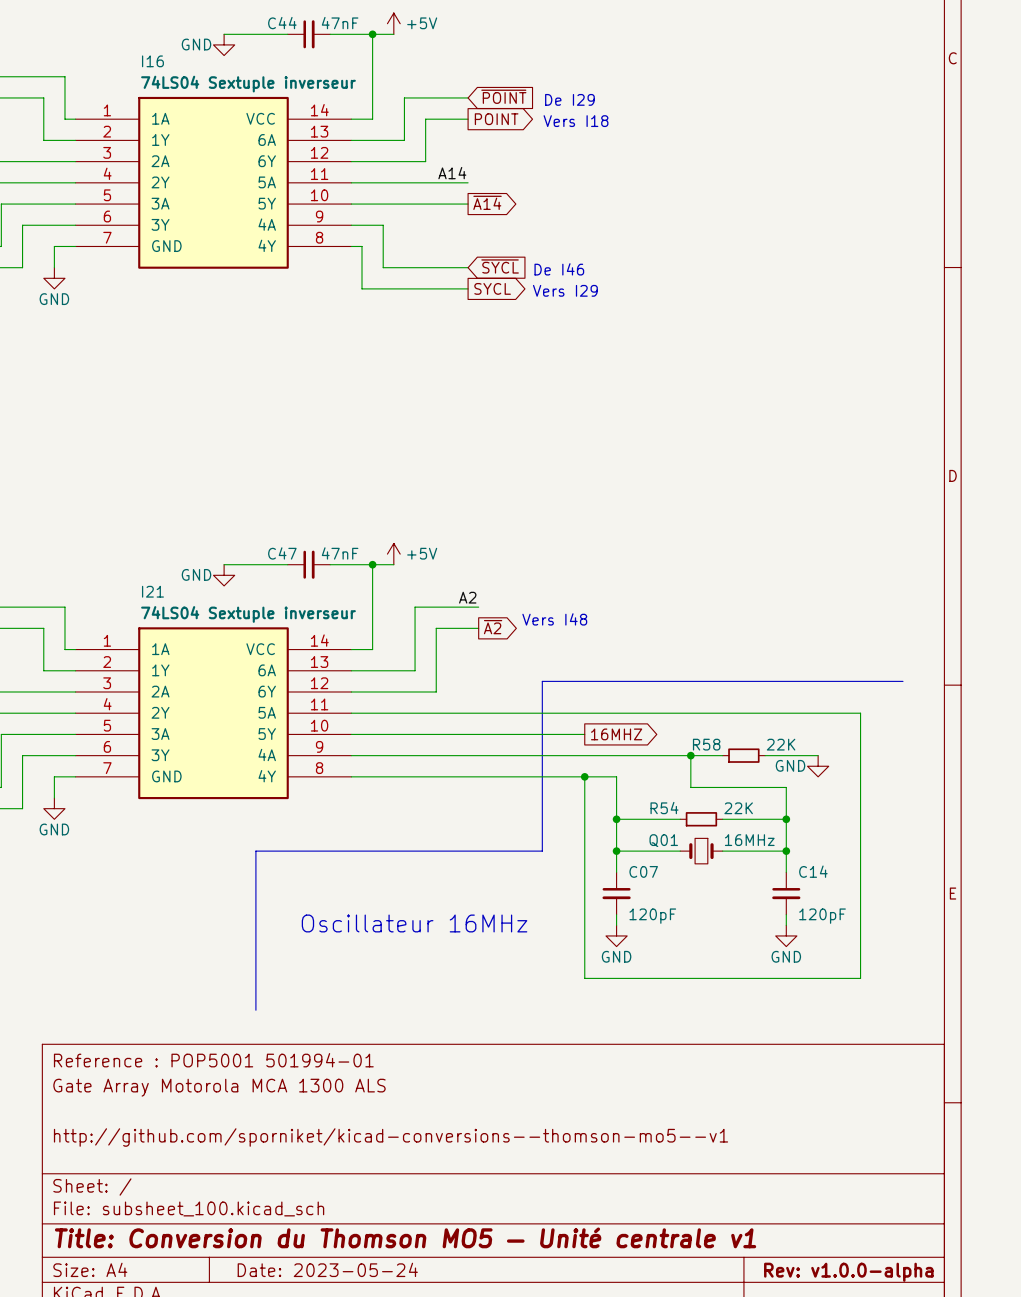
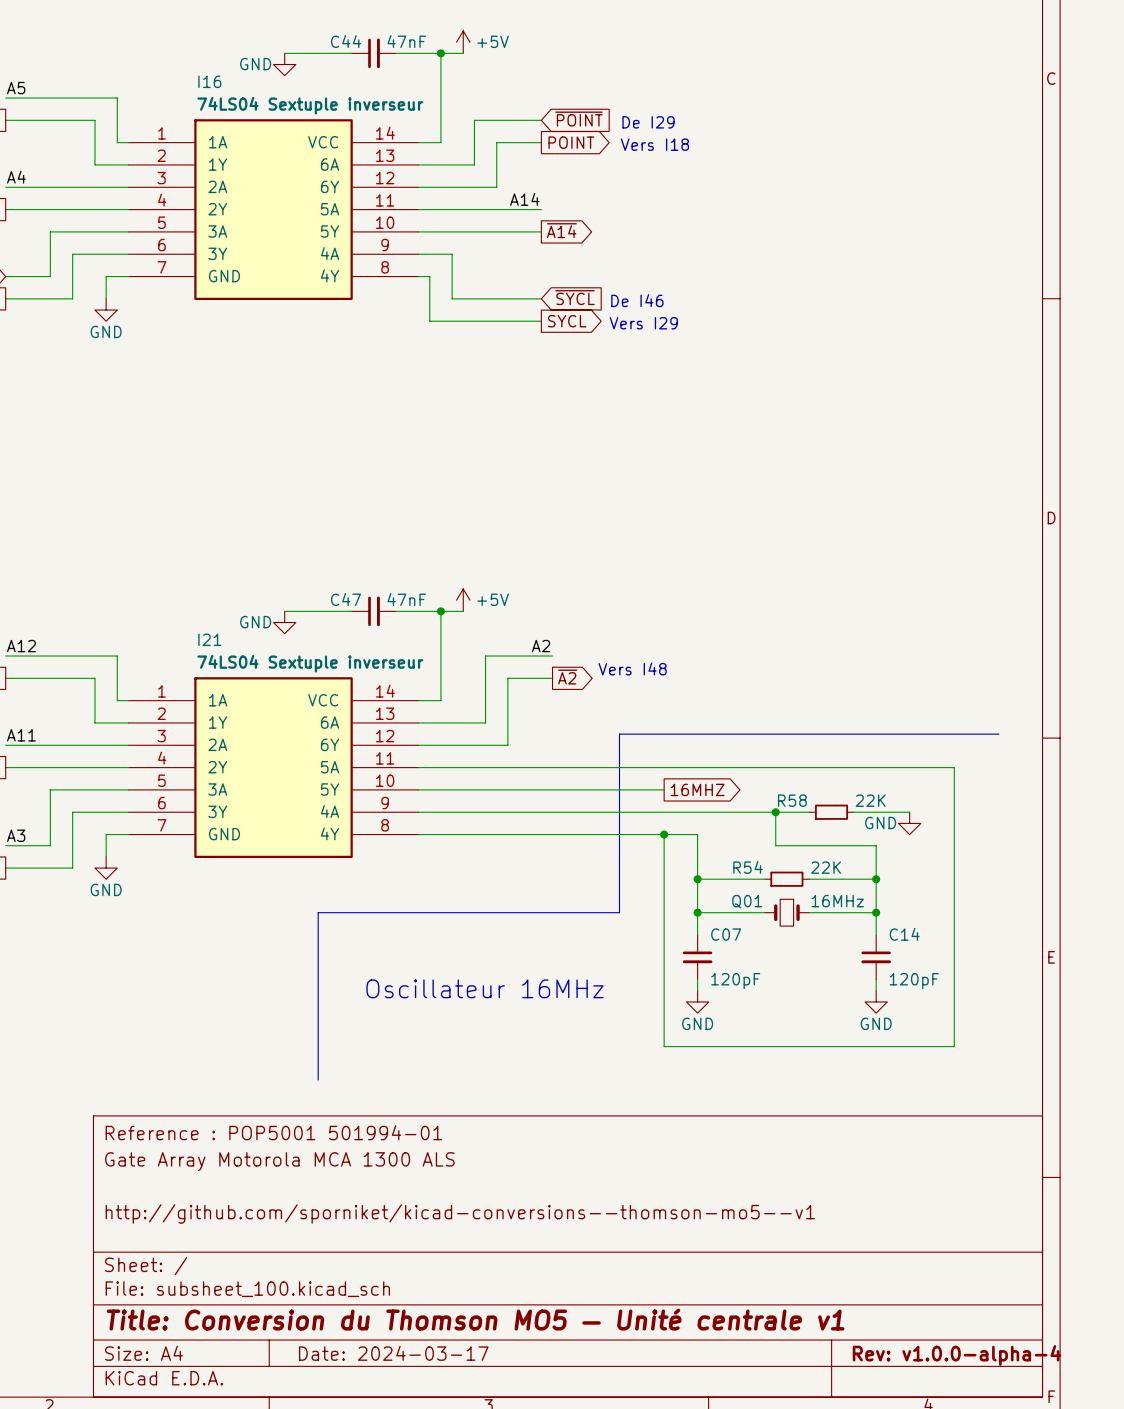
title block: Date: 2023-05-24 (327, 1269) -> Date: 2024-03-17 (393, 1353)
title block: Rev: v1.0.0-alpha (848, 1272) -> Rev: v1.0.0-alpha-4 (957, 1355)

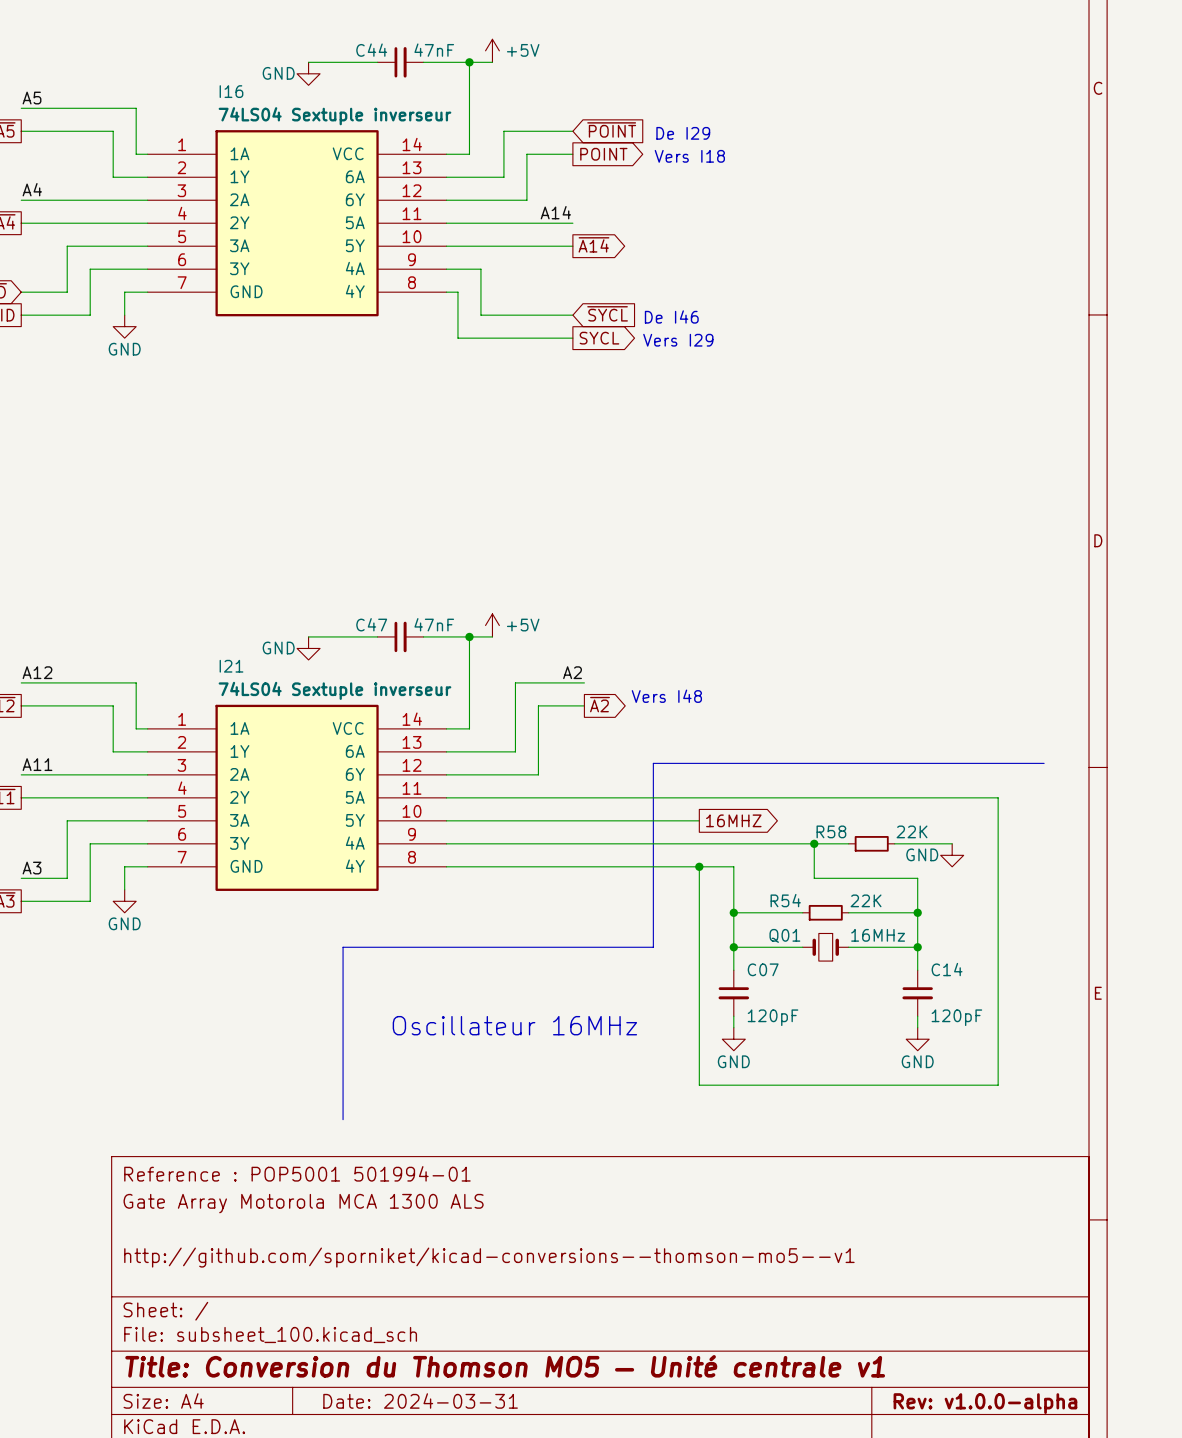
title block: Date: 2024-03-17 (393, 1353) -> Date: 2024-03-31 (420, 1400)
title block: Rev: v1.0.0-alpha-4 (957, 1355) -> Rev: v1.0.0-alpha (985, 1403)

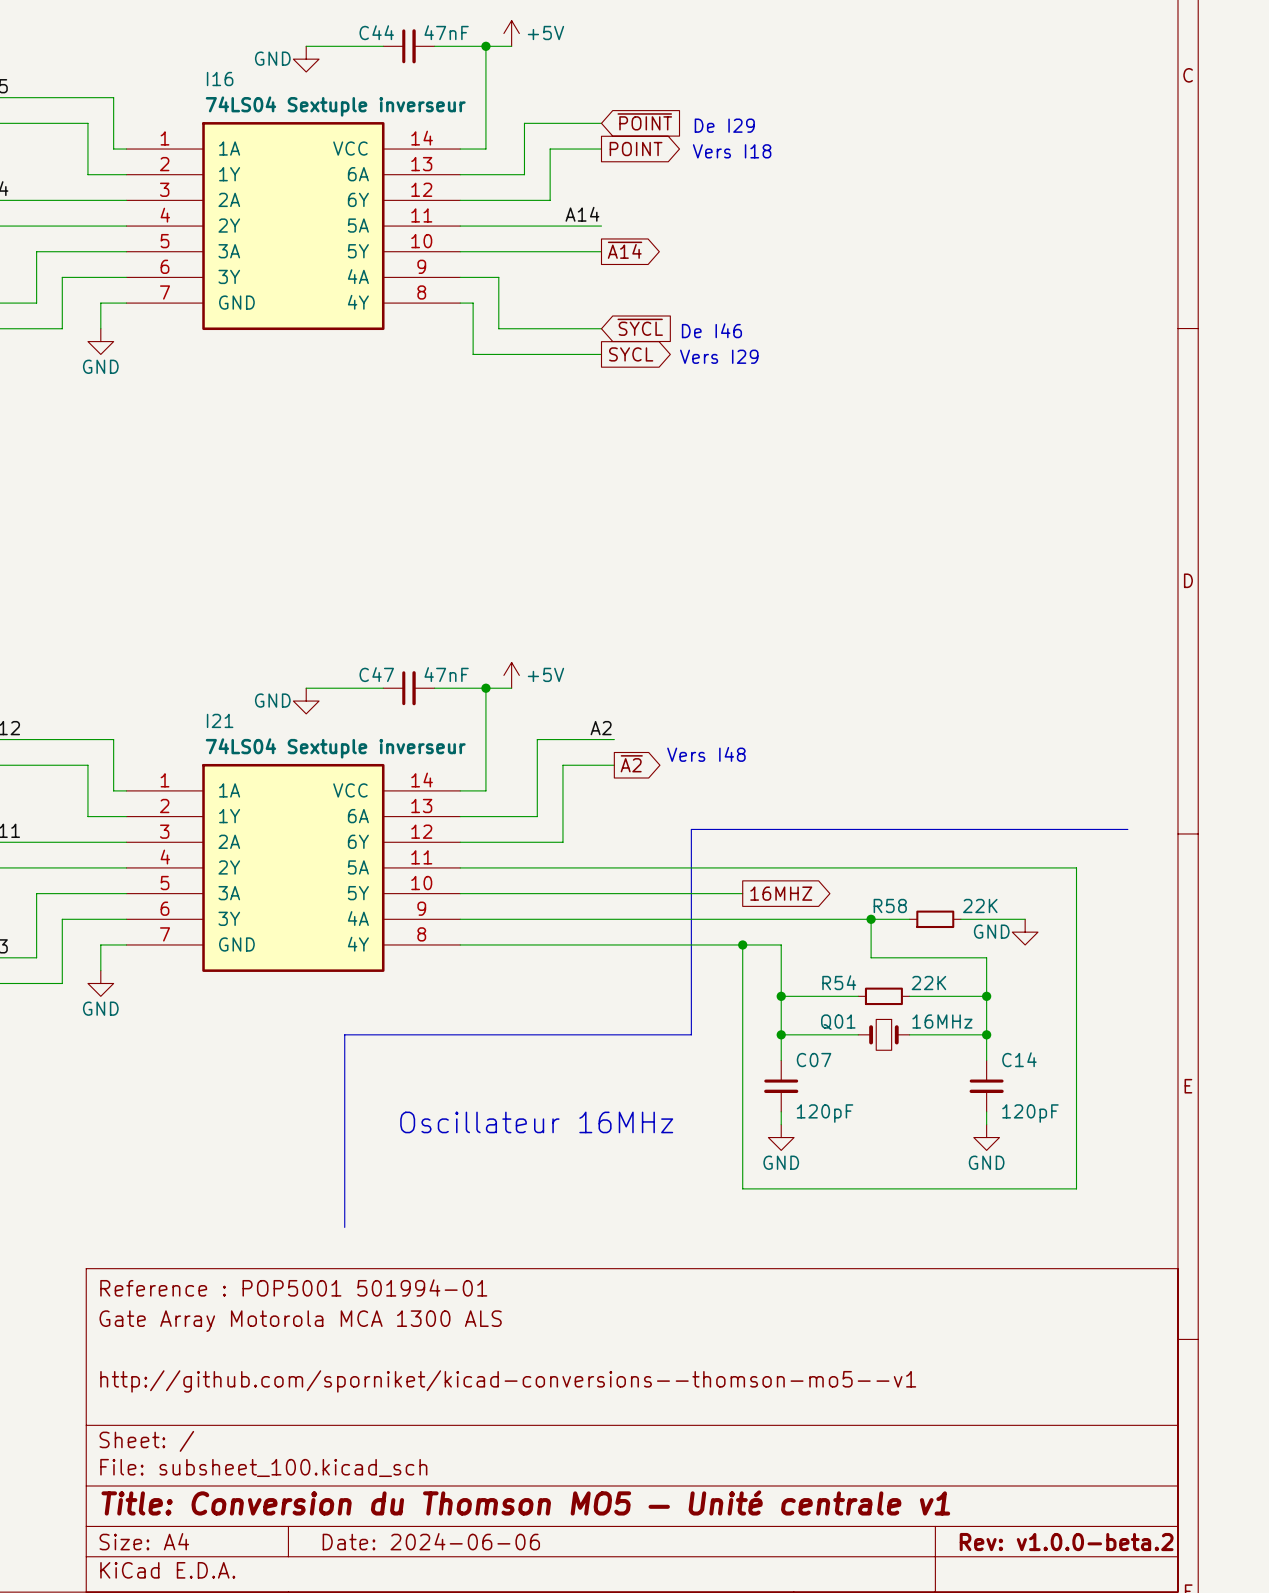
title block: Date: 2024-03-31 (420, 1400) -> Date: 2024-06-06 (431, 1541)
title block: Rev: v1.0.0-alpha (985, 1403) -> Rev: v1.0.0-beta.2 (1066, 1542)

